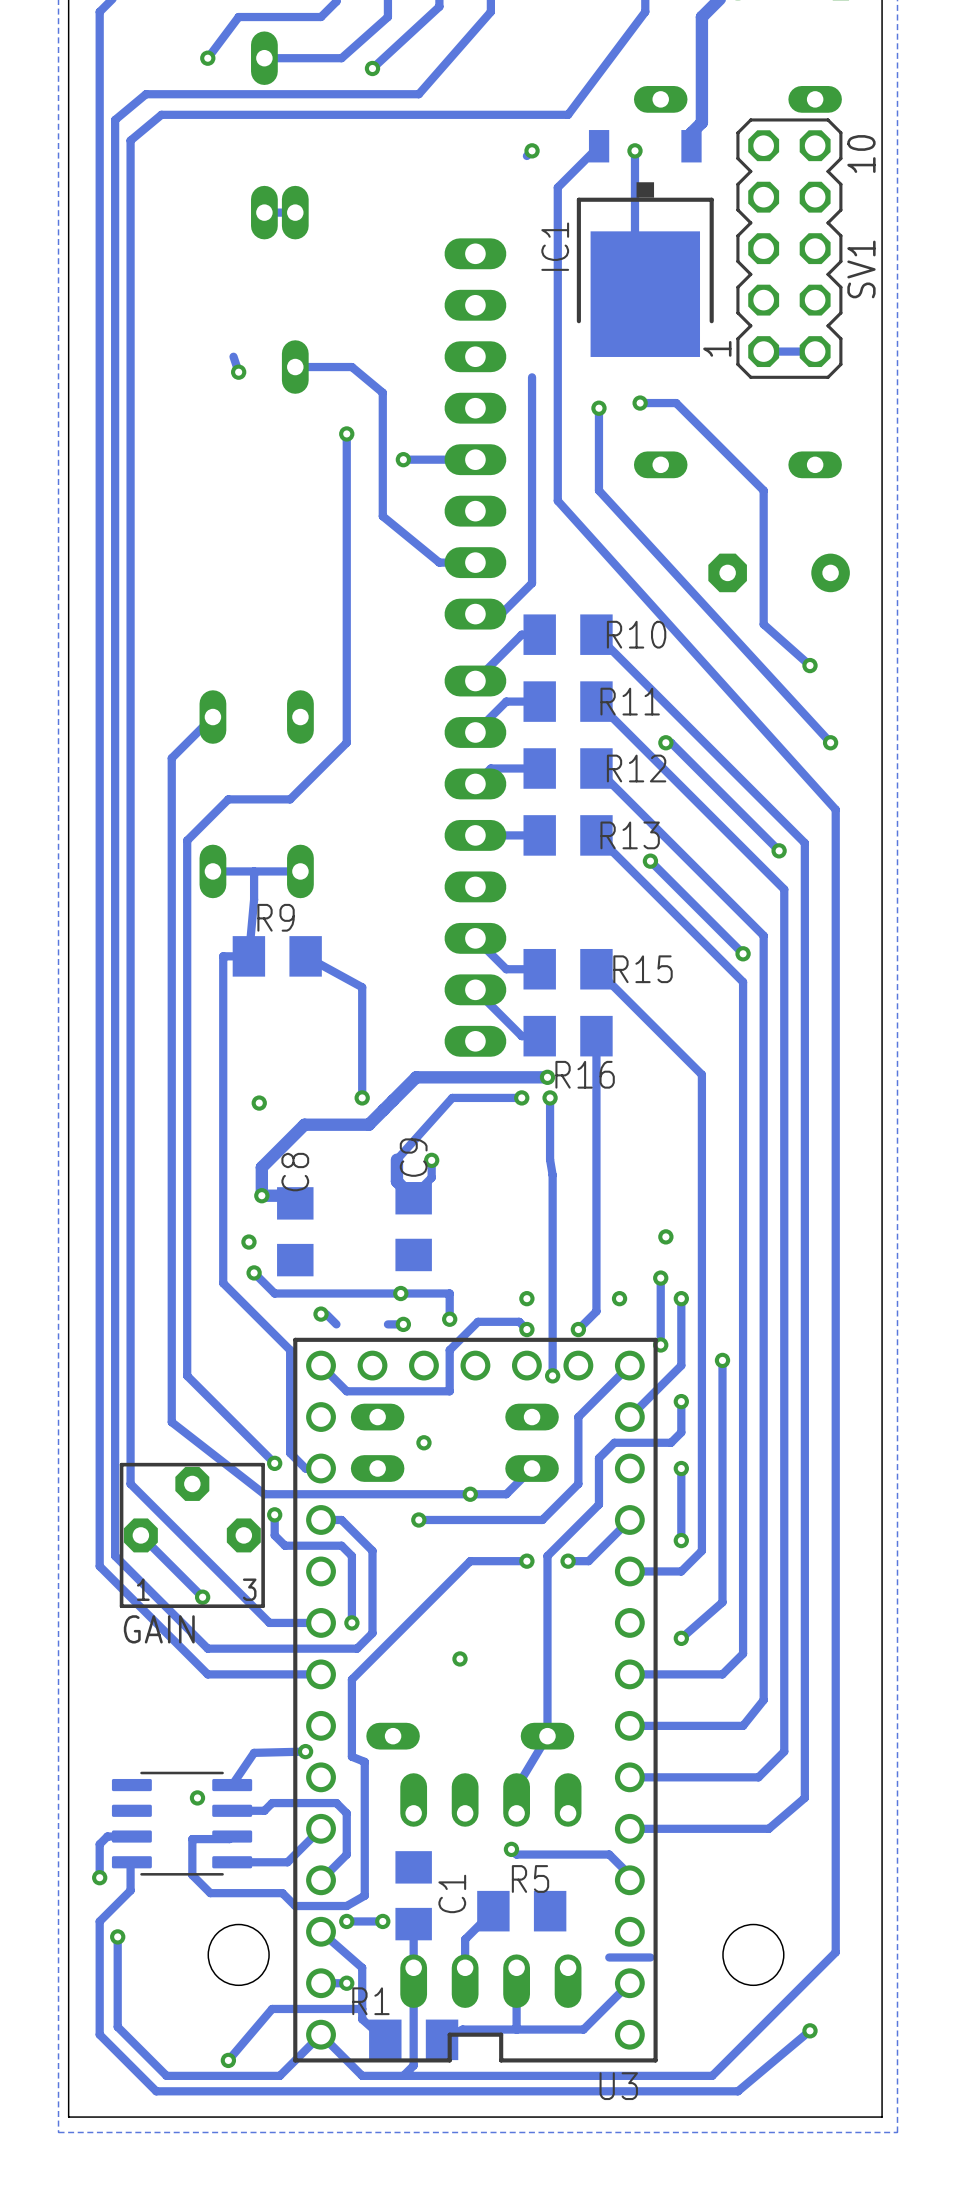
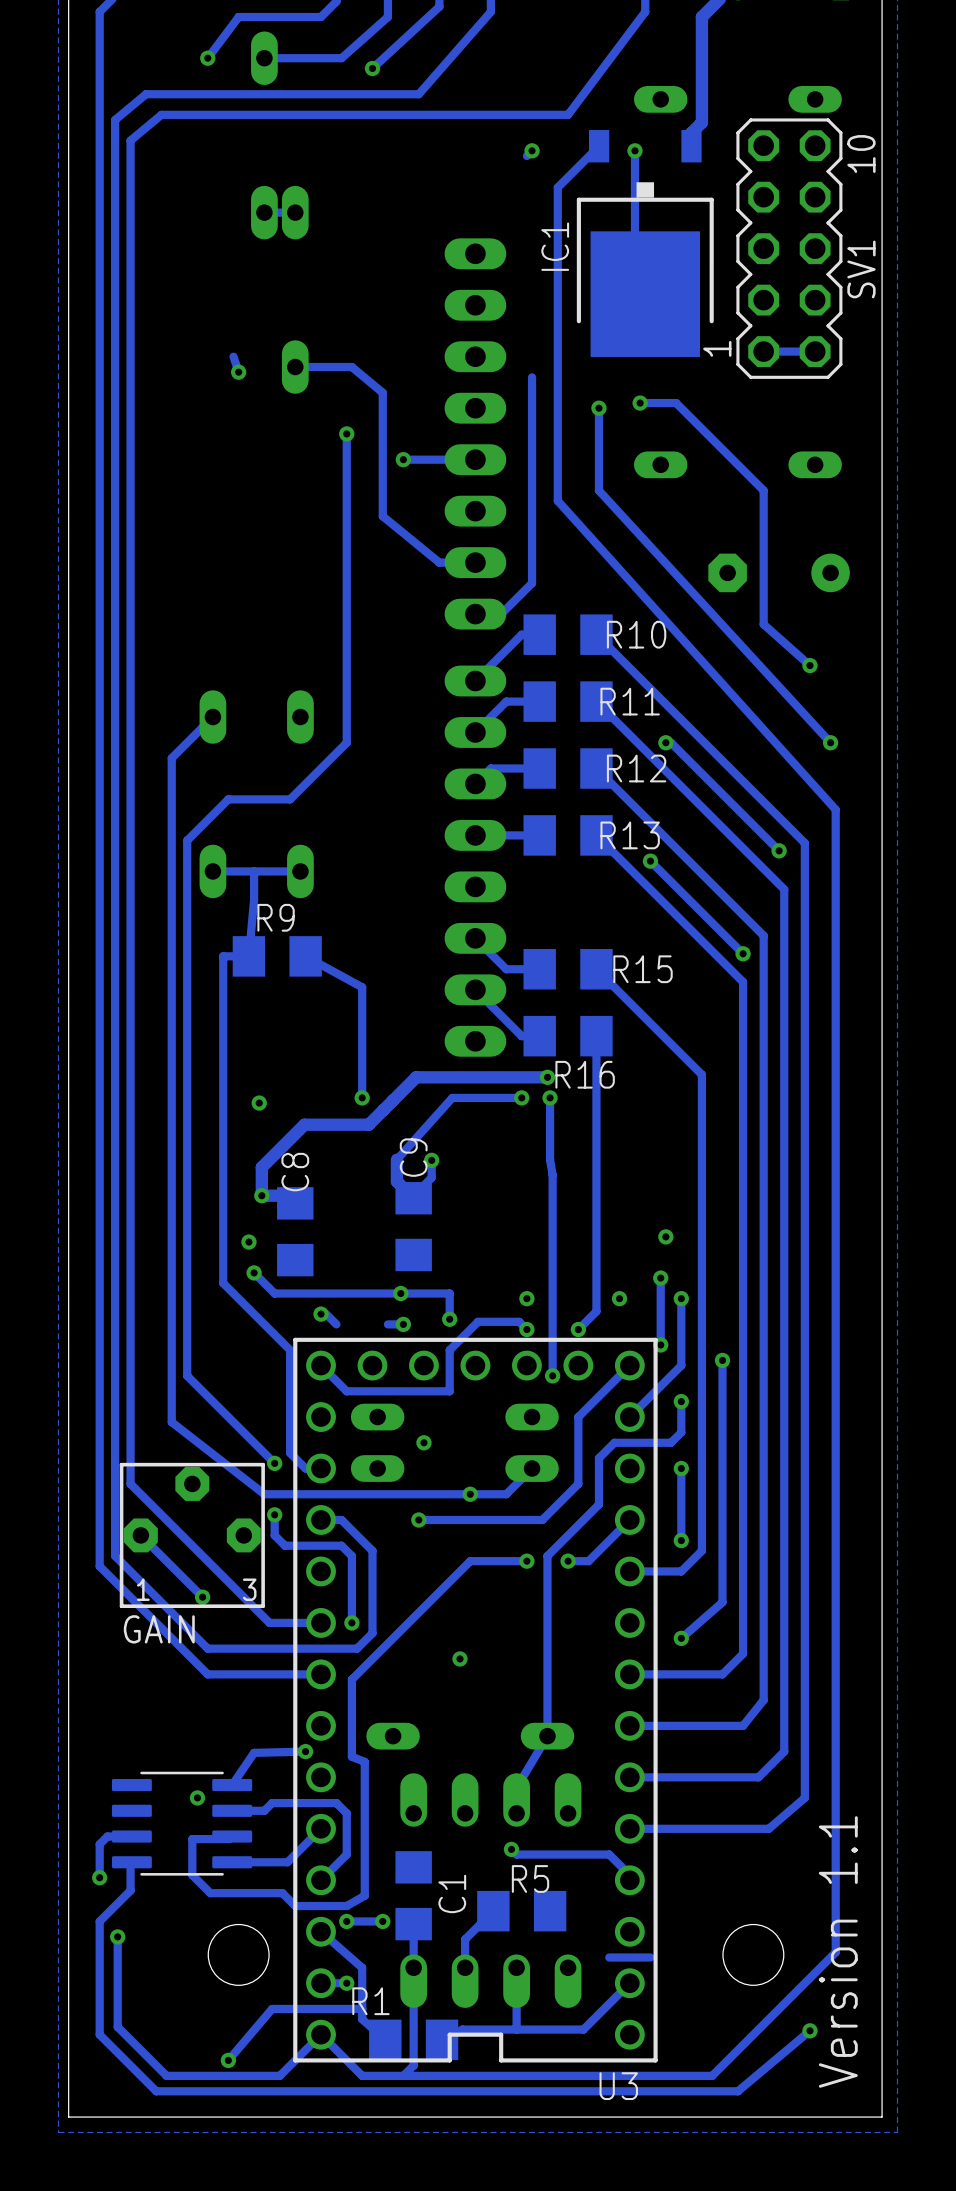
text: none -> Version 1.1 (838, 1951)

